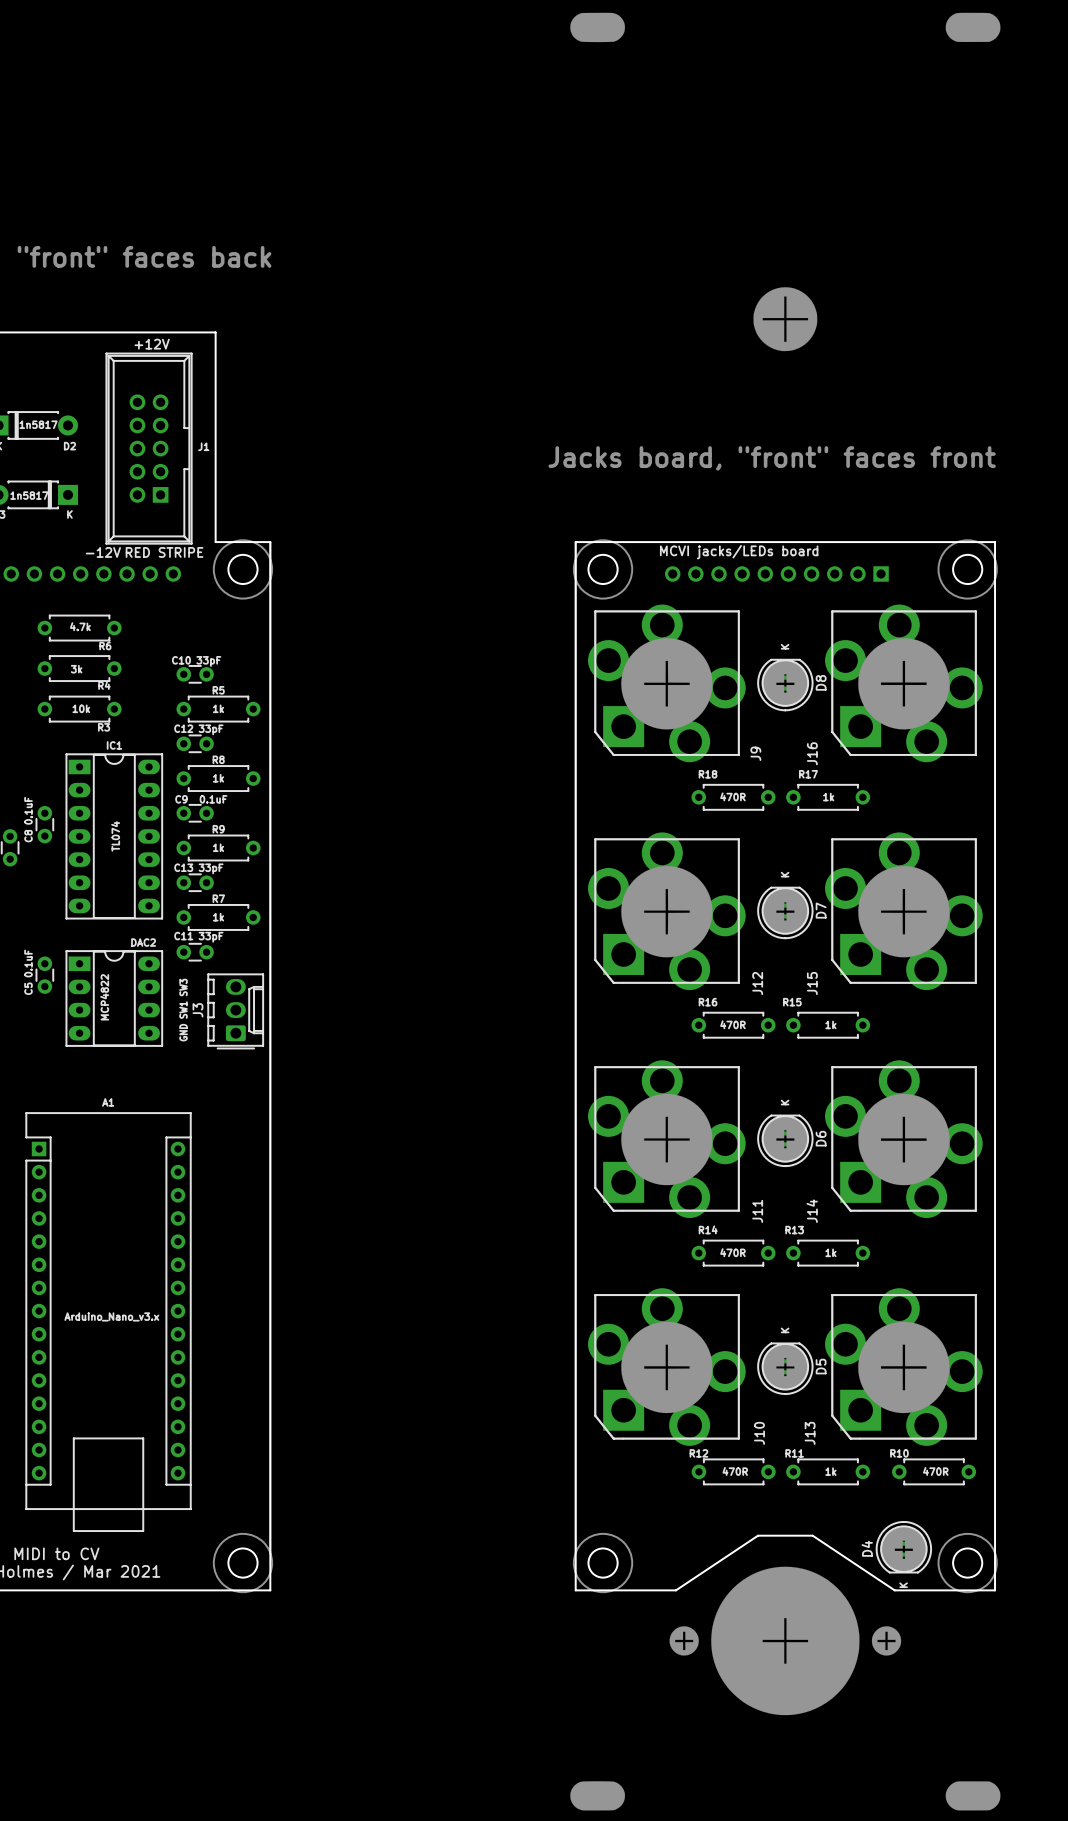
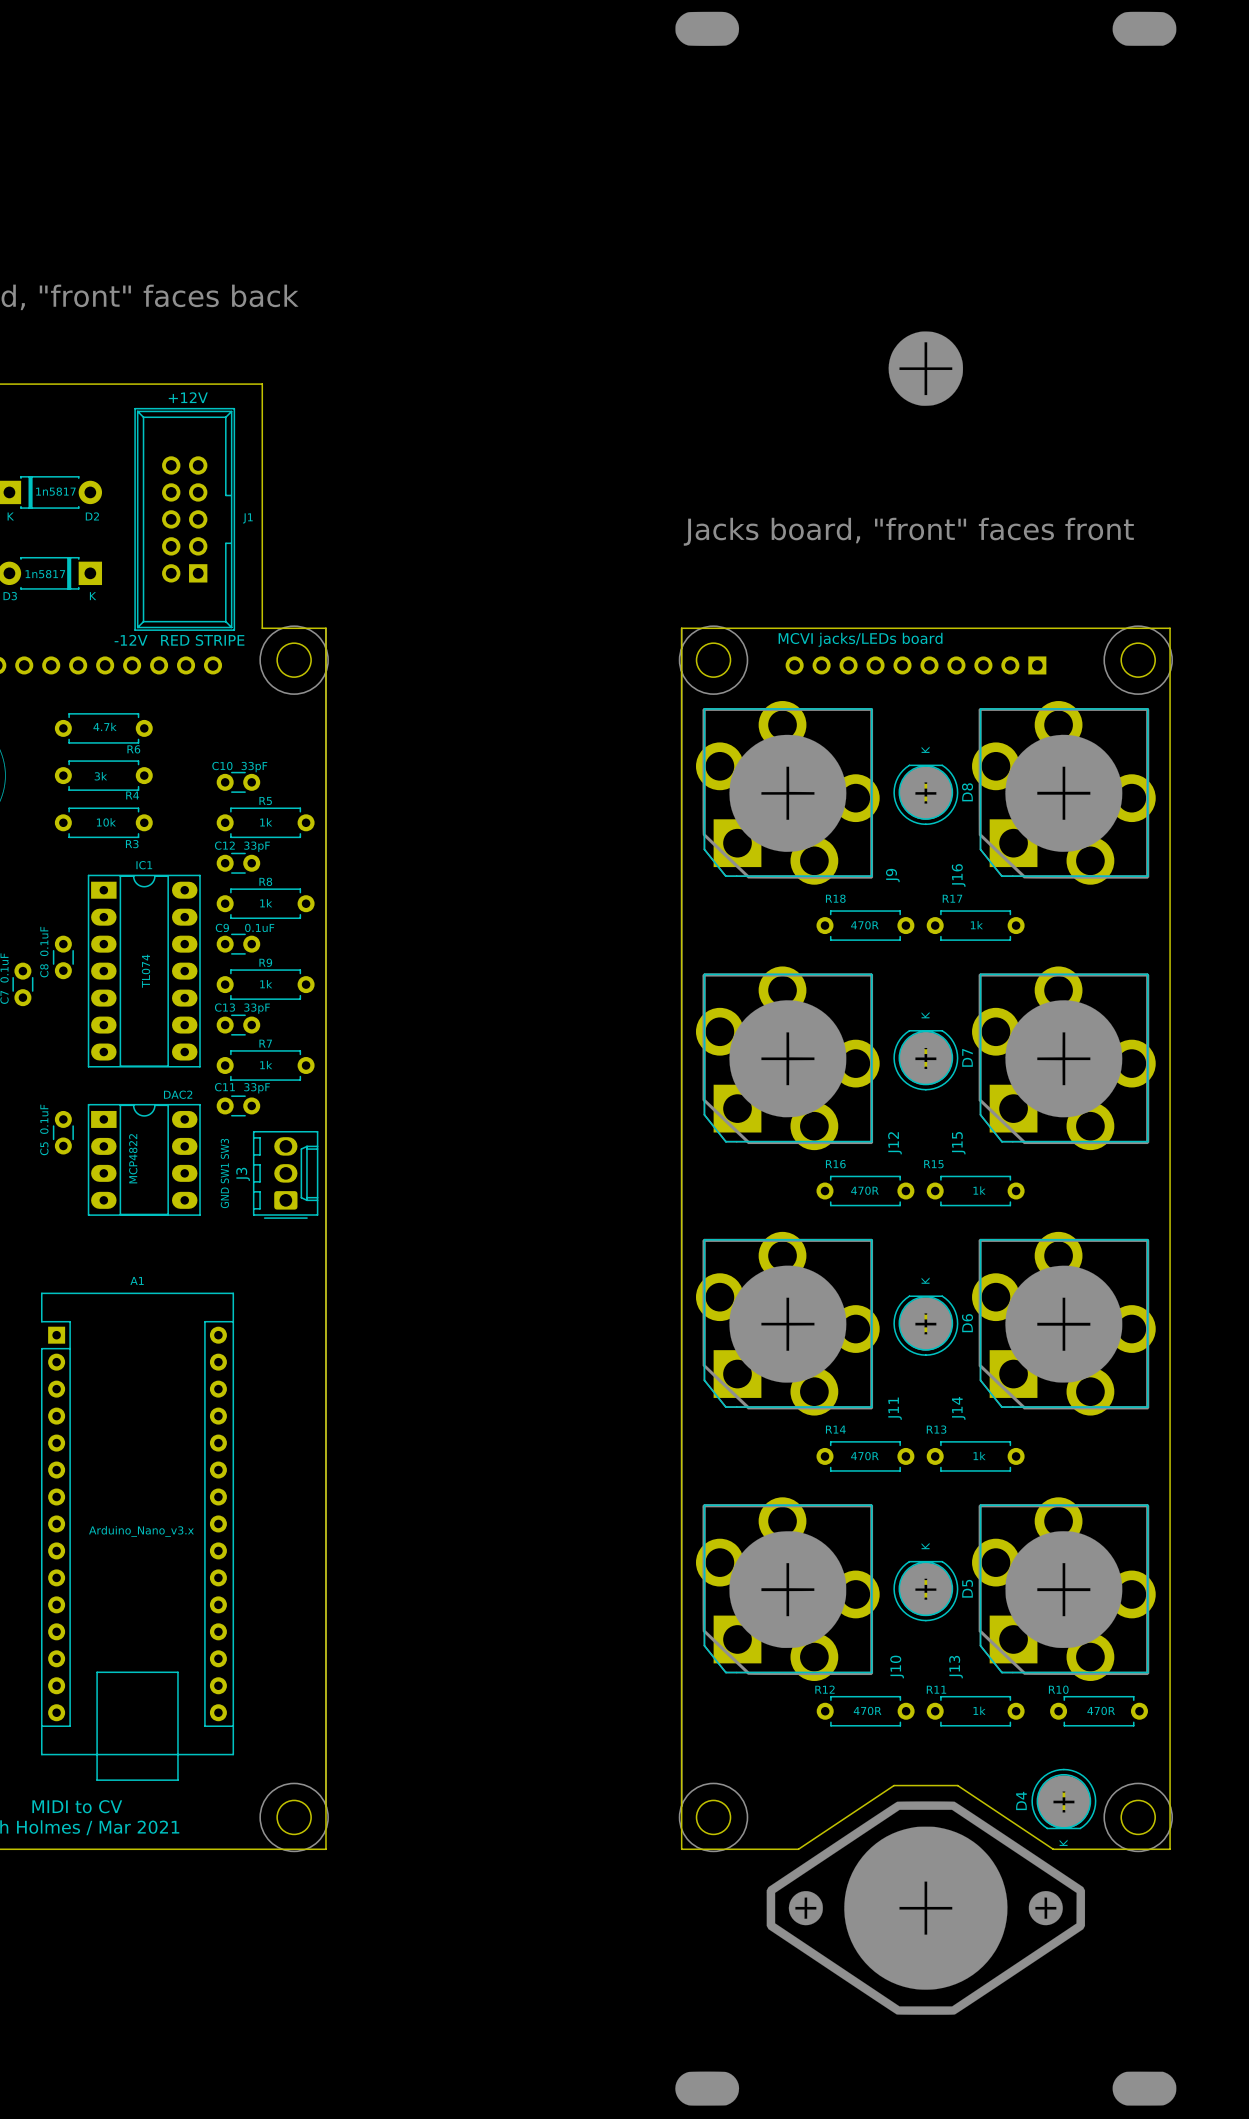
drawing shape: [570, 12, 1001, 1811] -> [675, 11, 1177, 2106]

